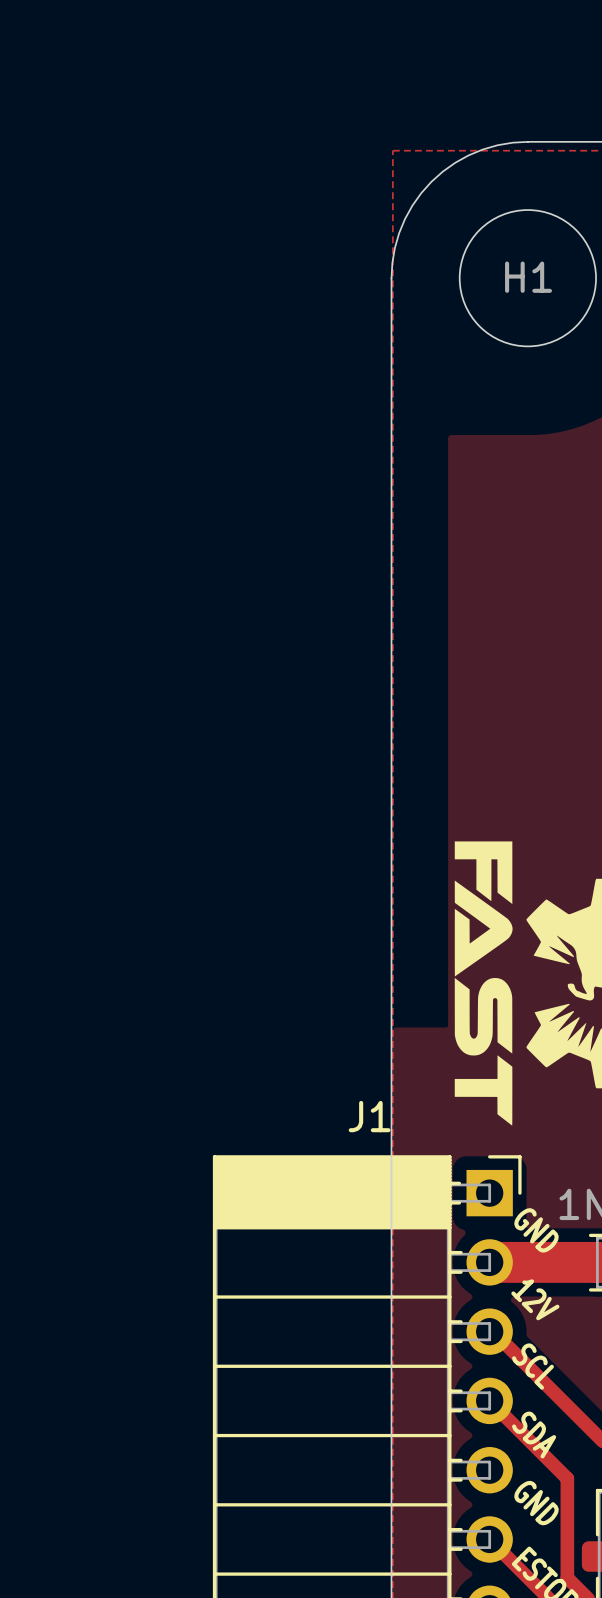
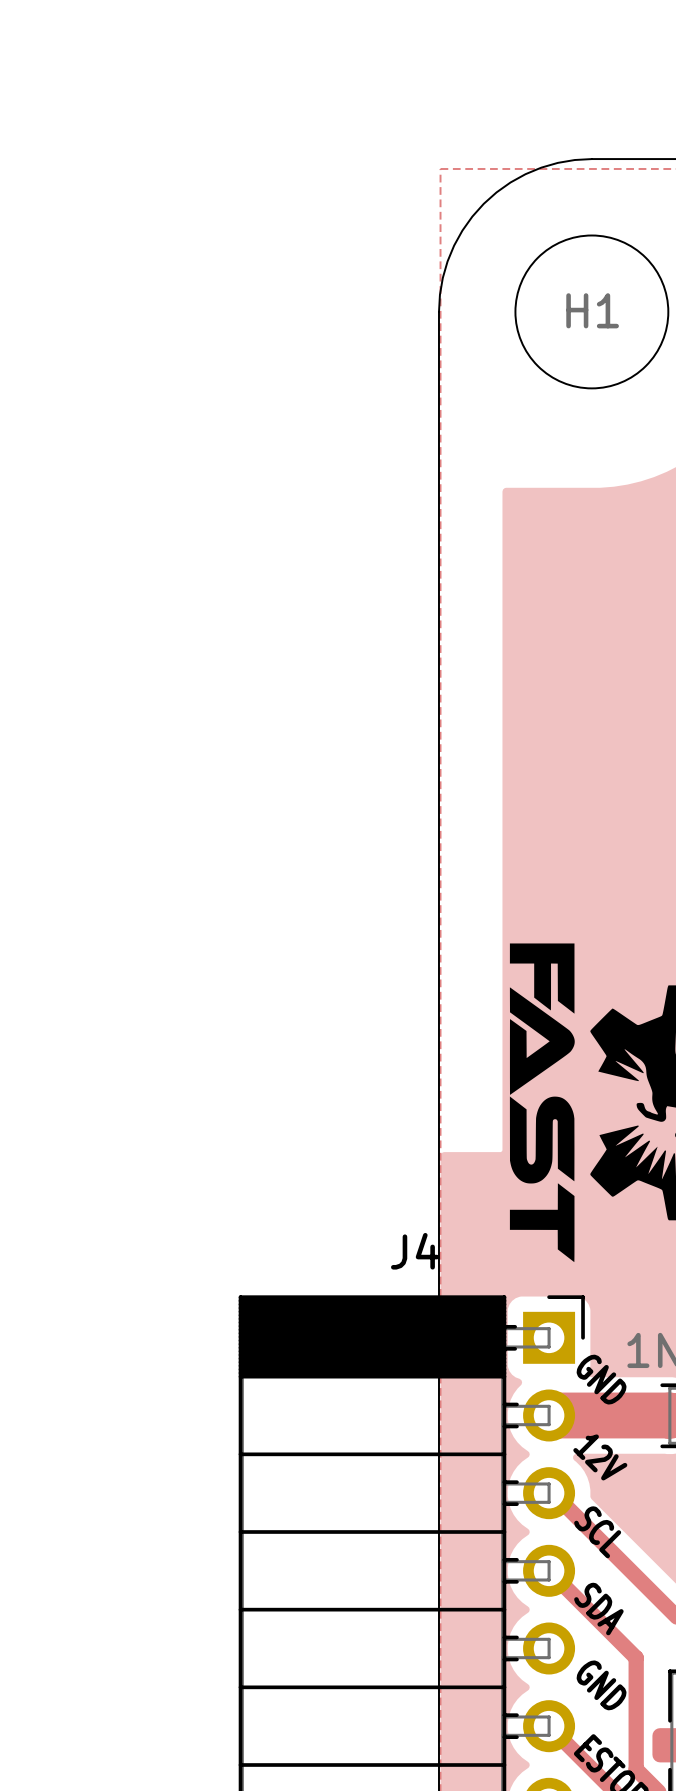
J1 name: J1 (369, 1116) -> J4 (415, 1251)

